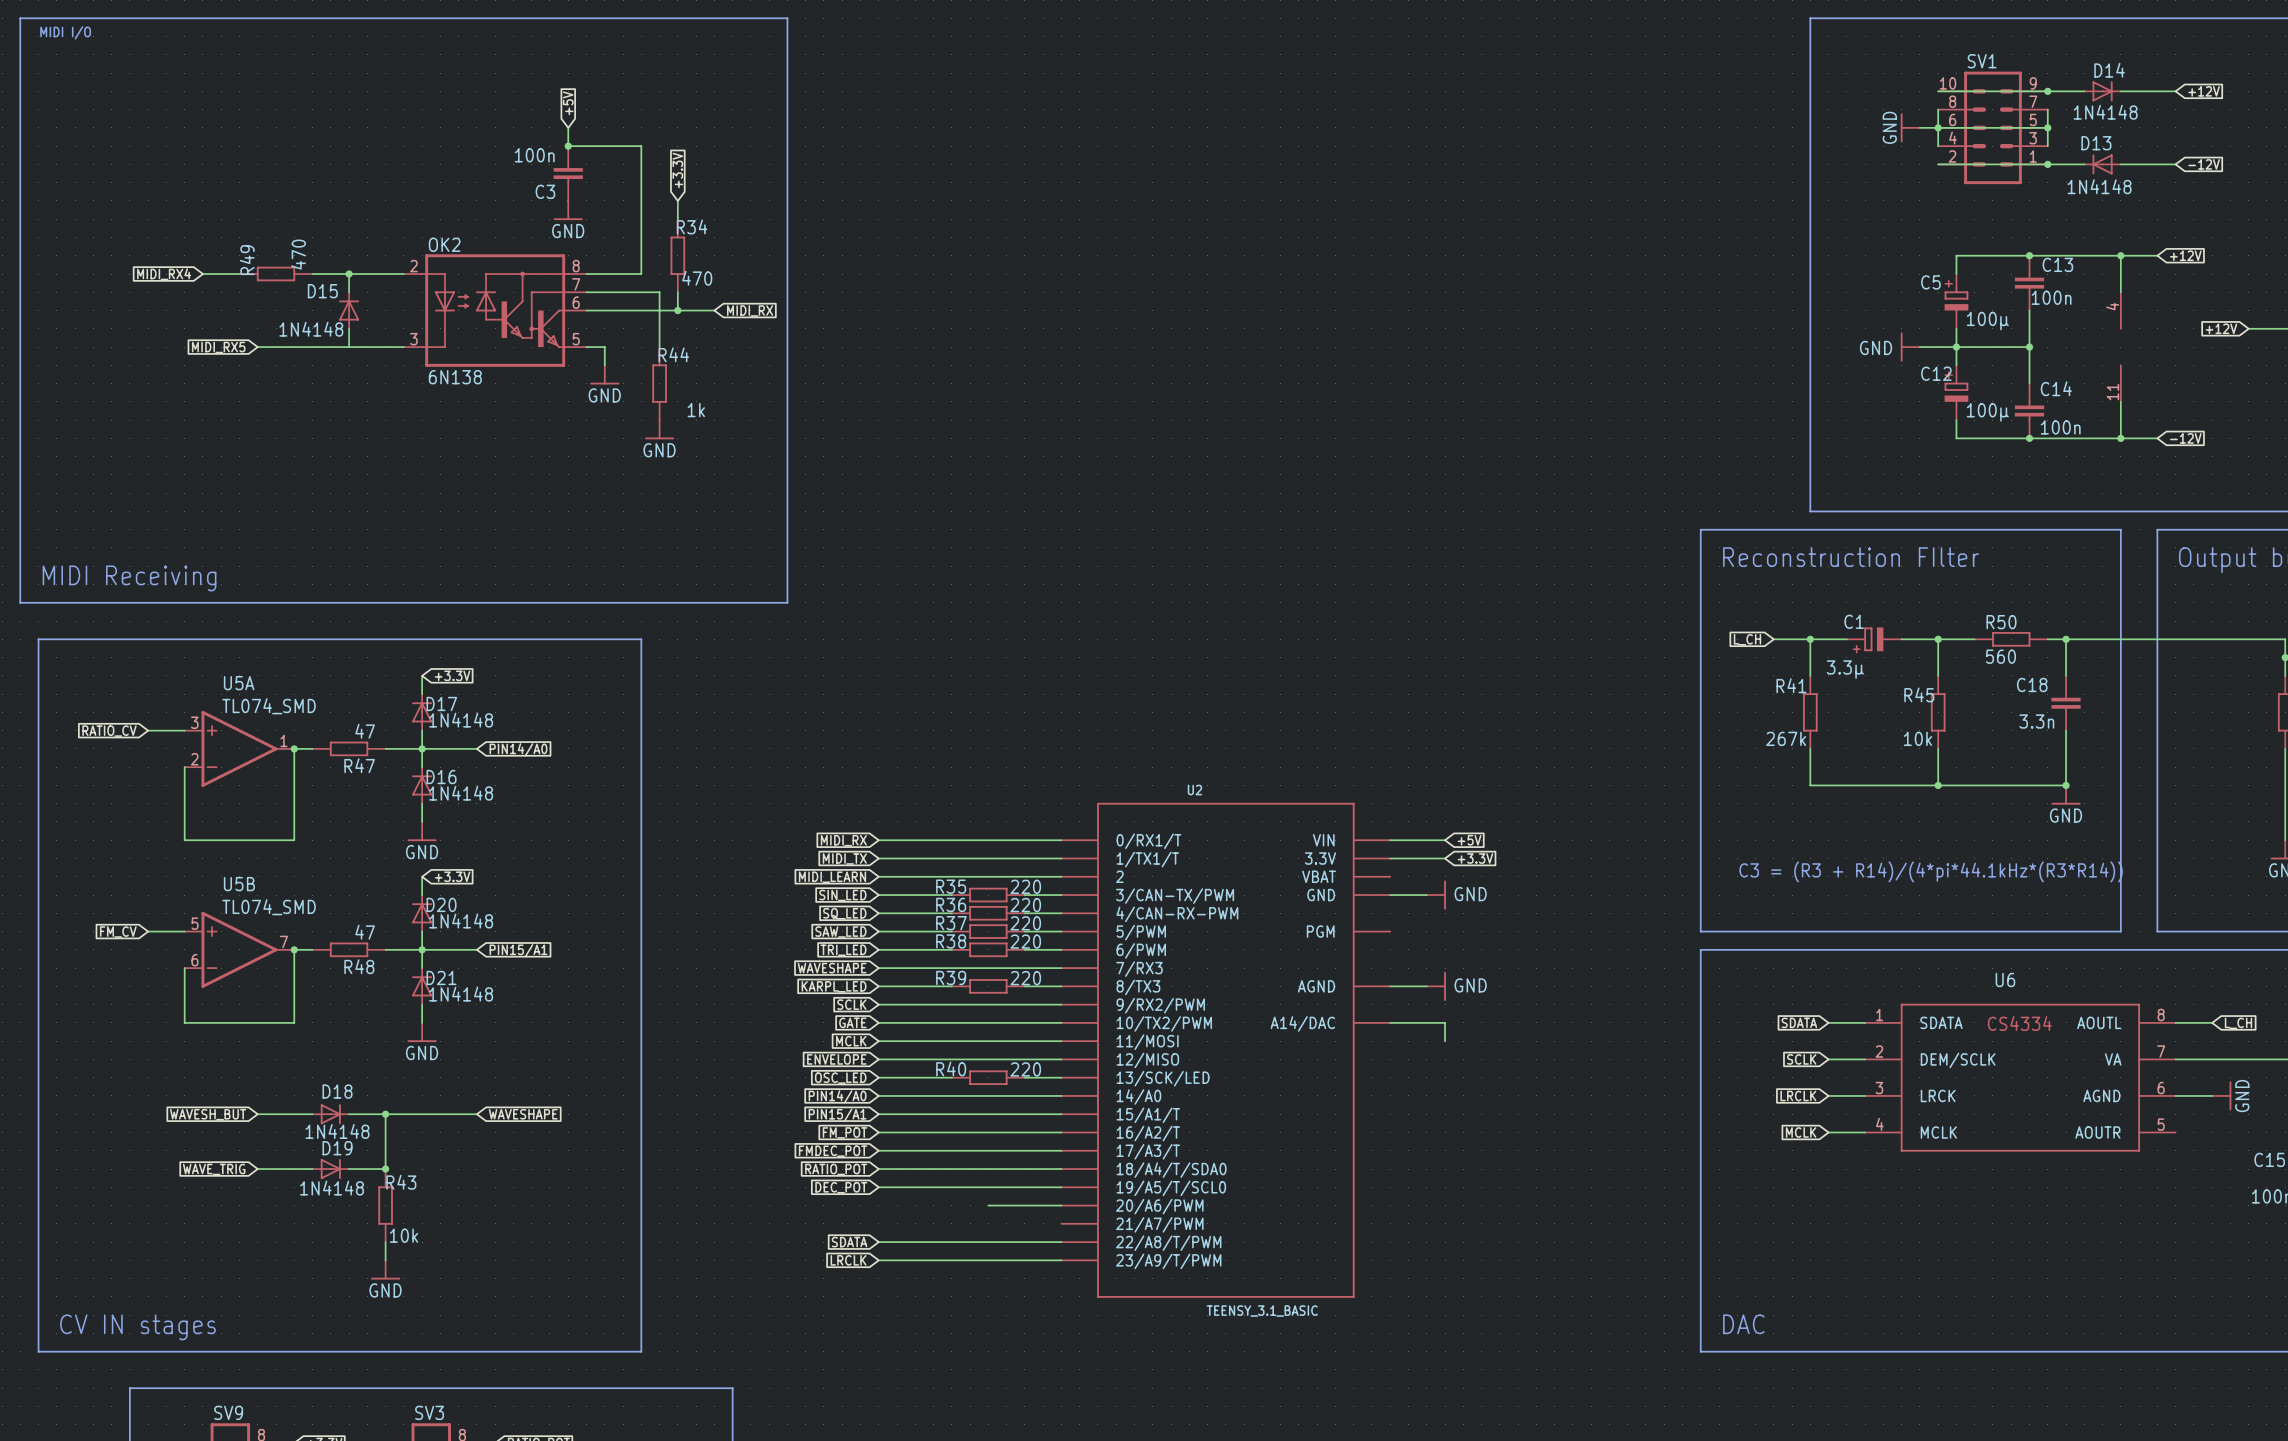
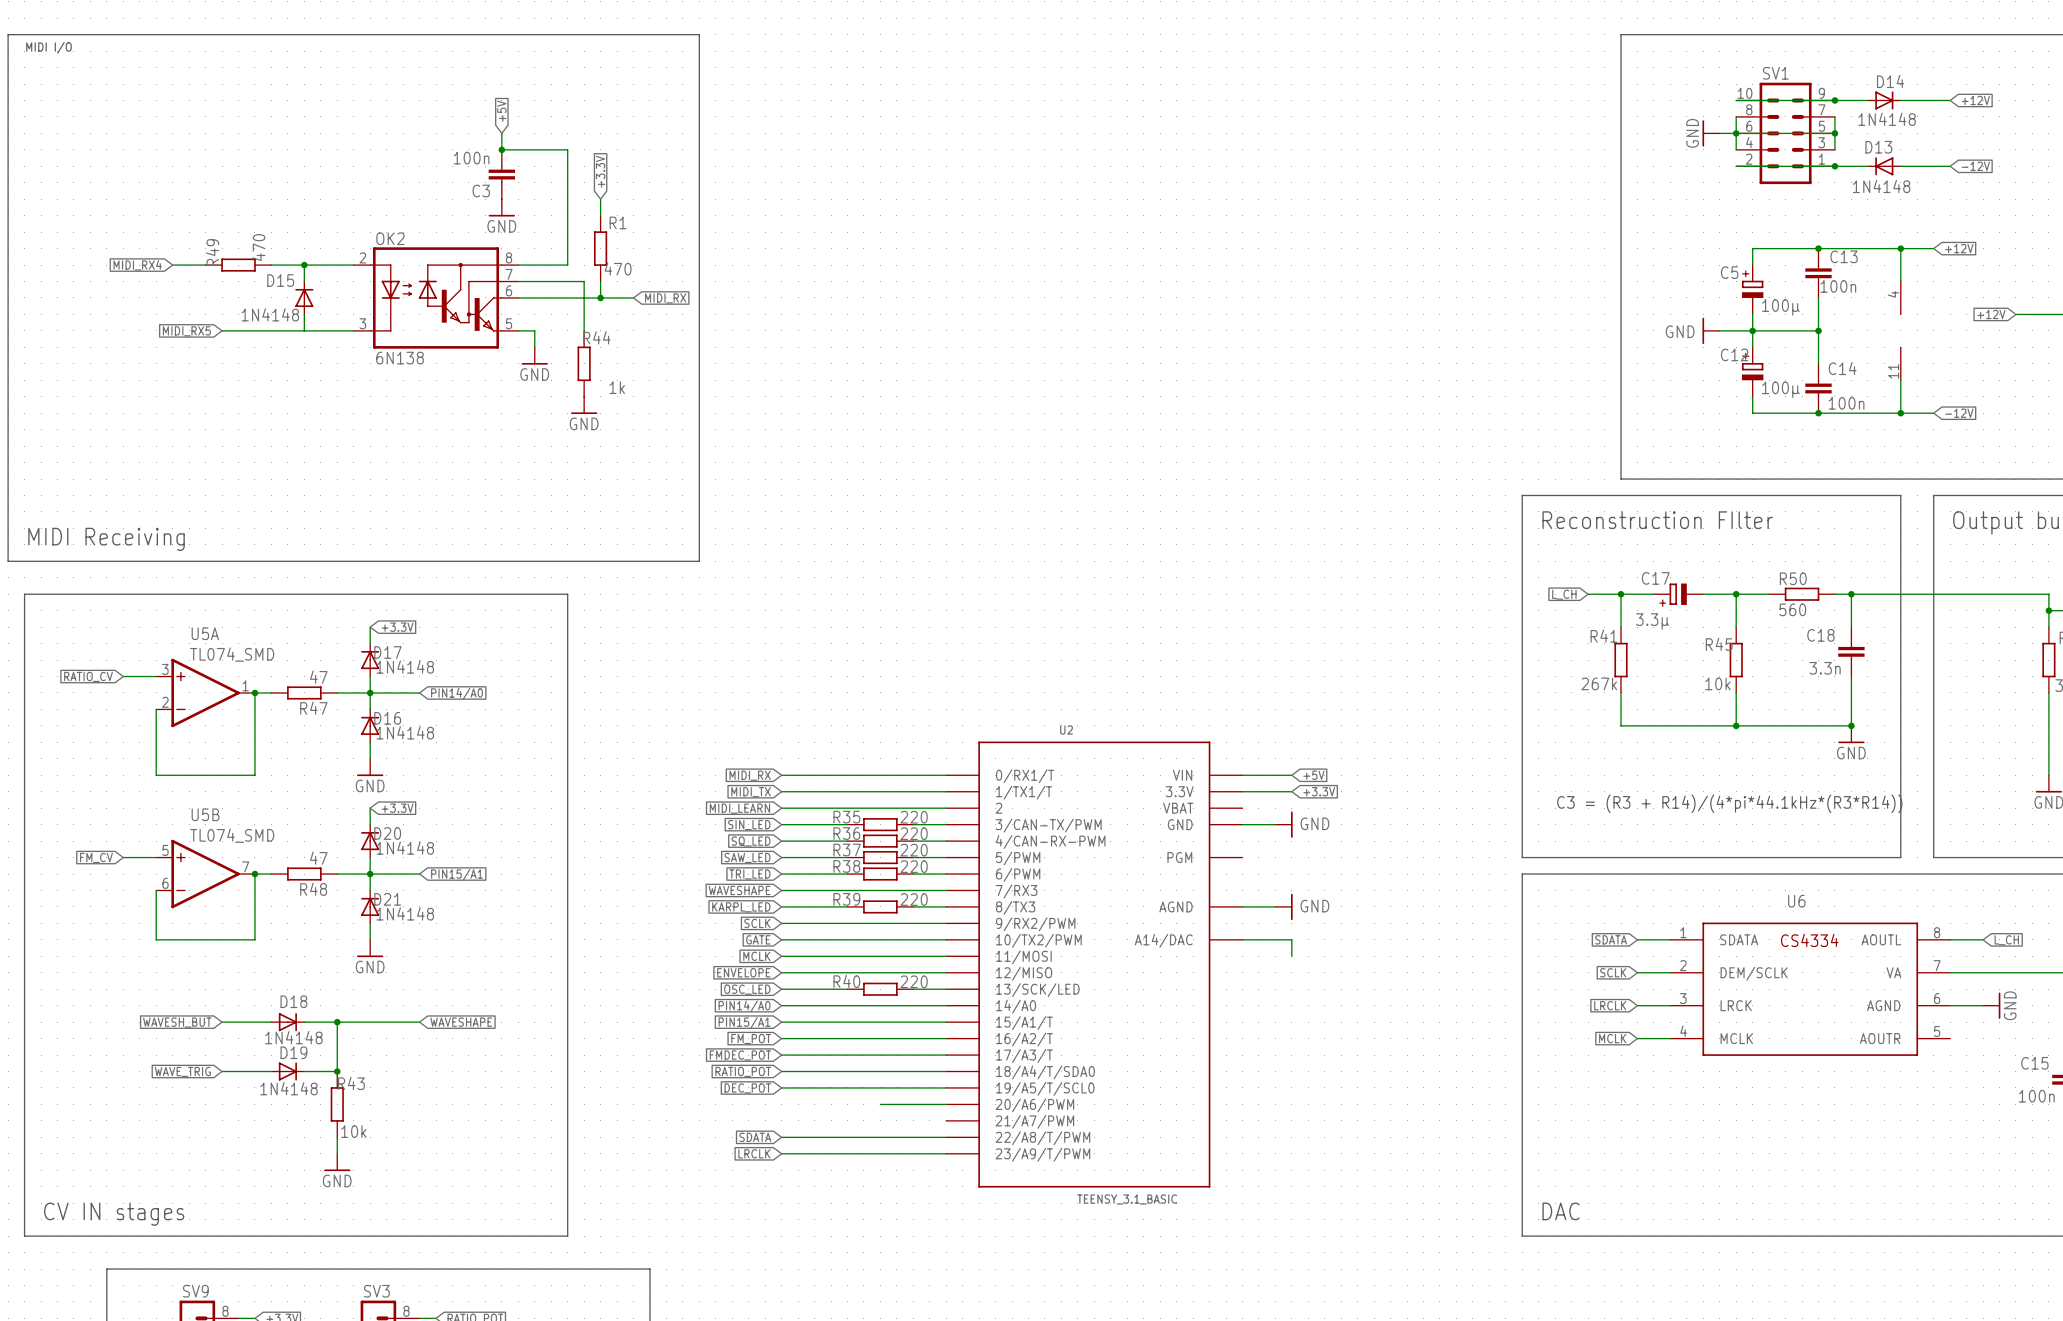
R34 name: R34 (692, 226) -> R1 (618, 222)
C1 name: C1 (1854, 621) -> C17 (1655, 578)

